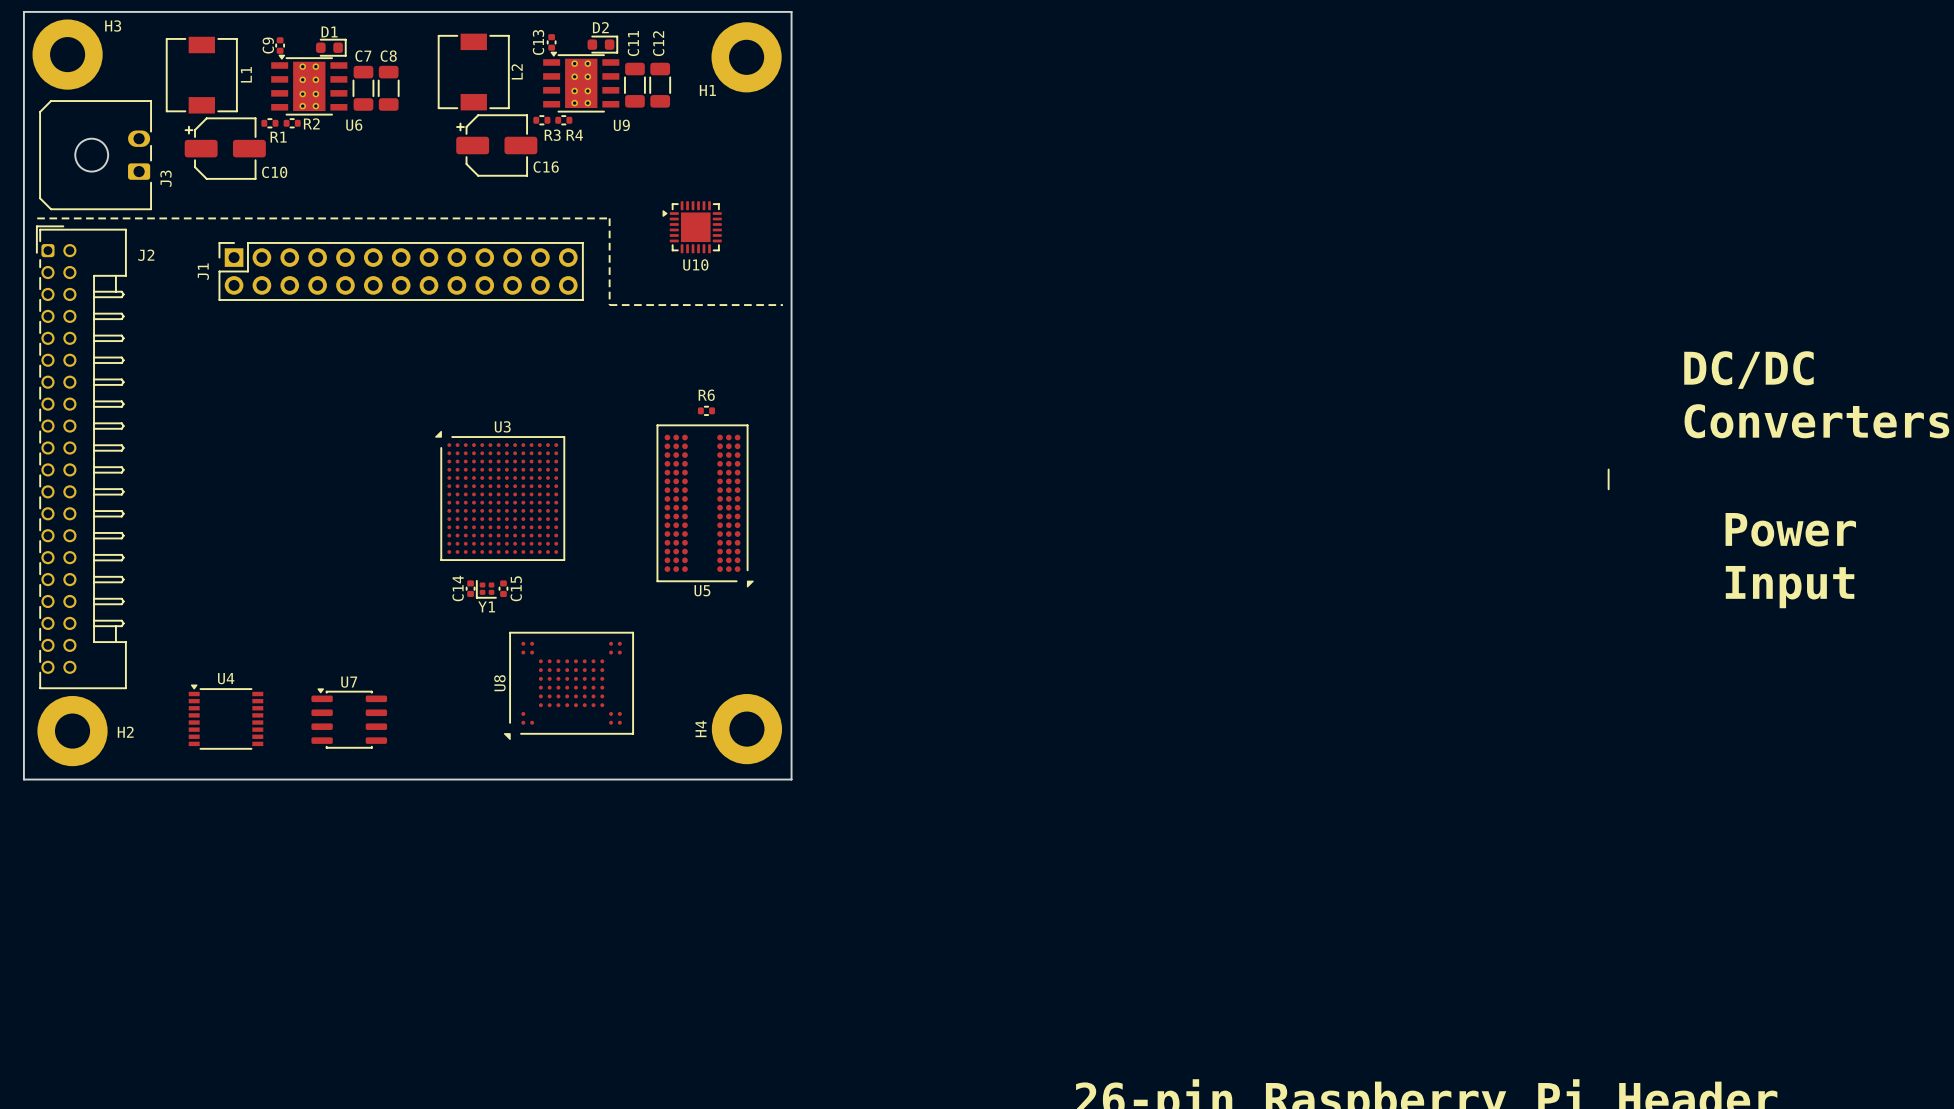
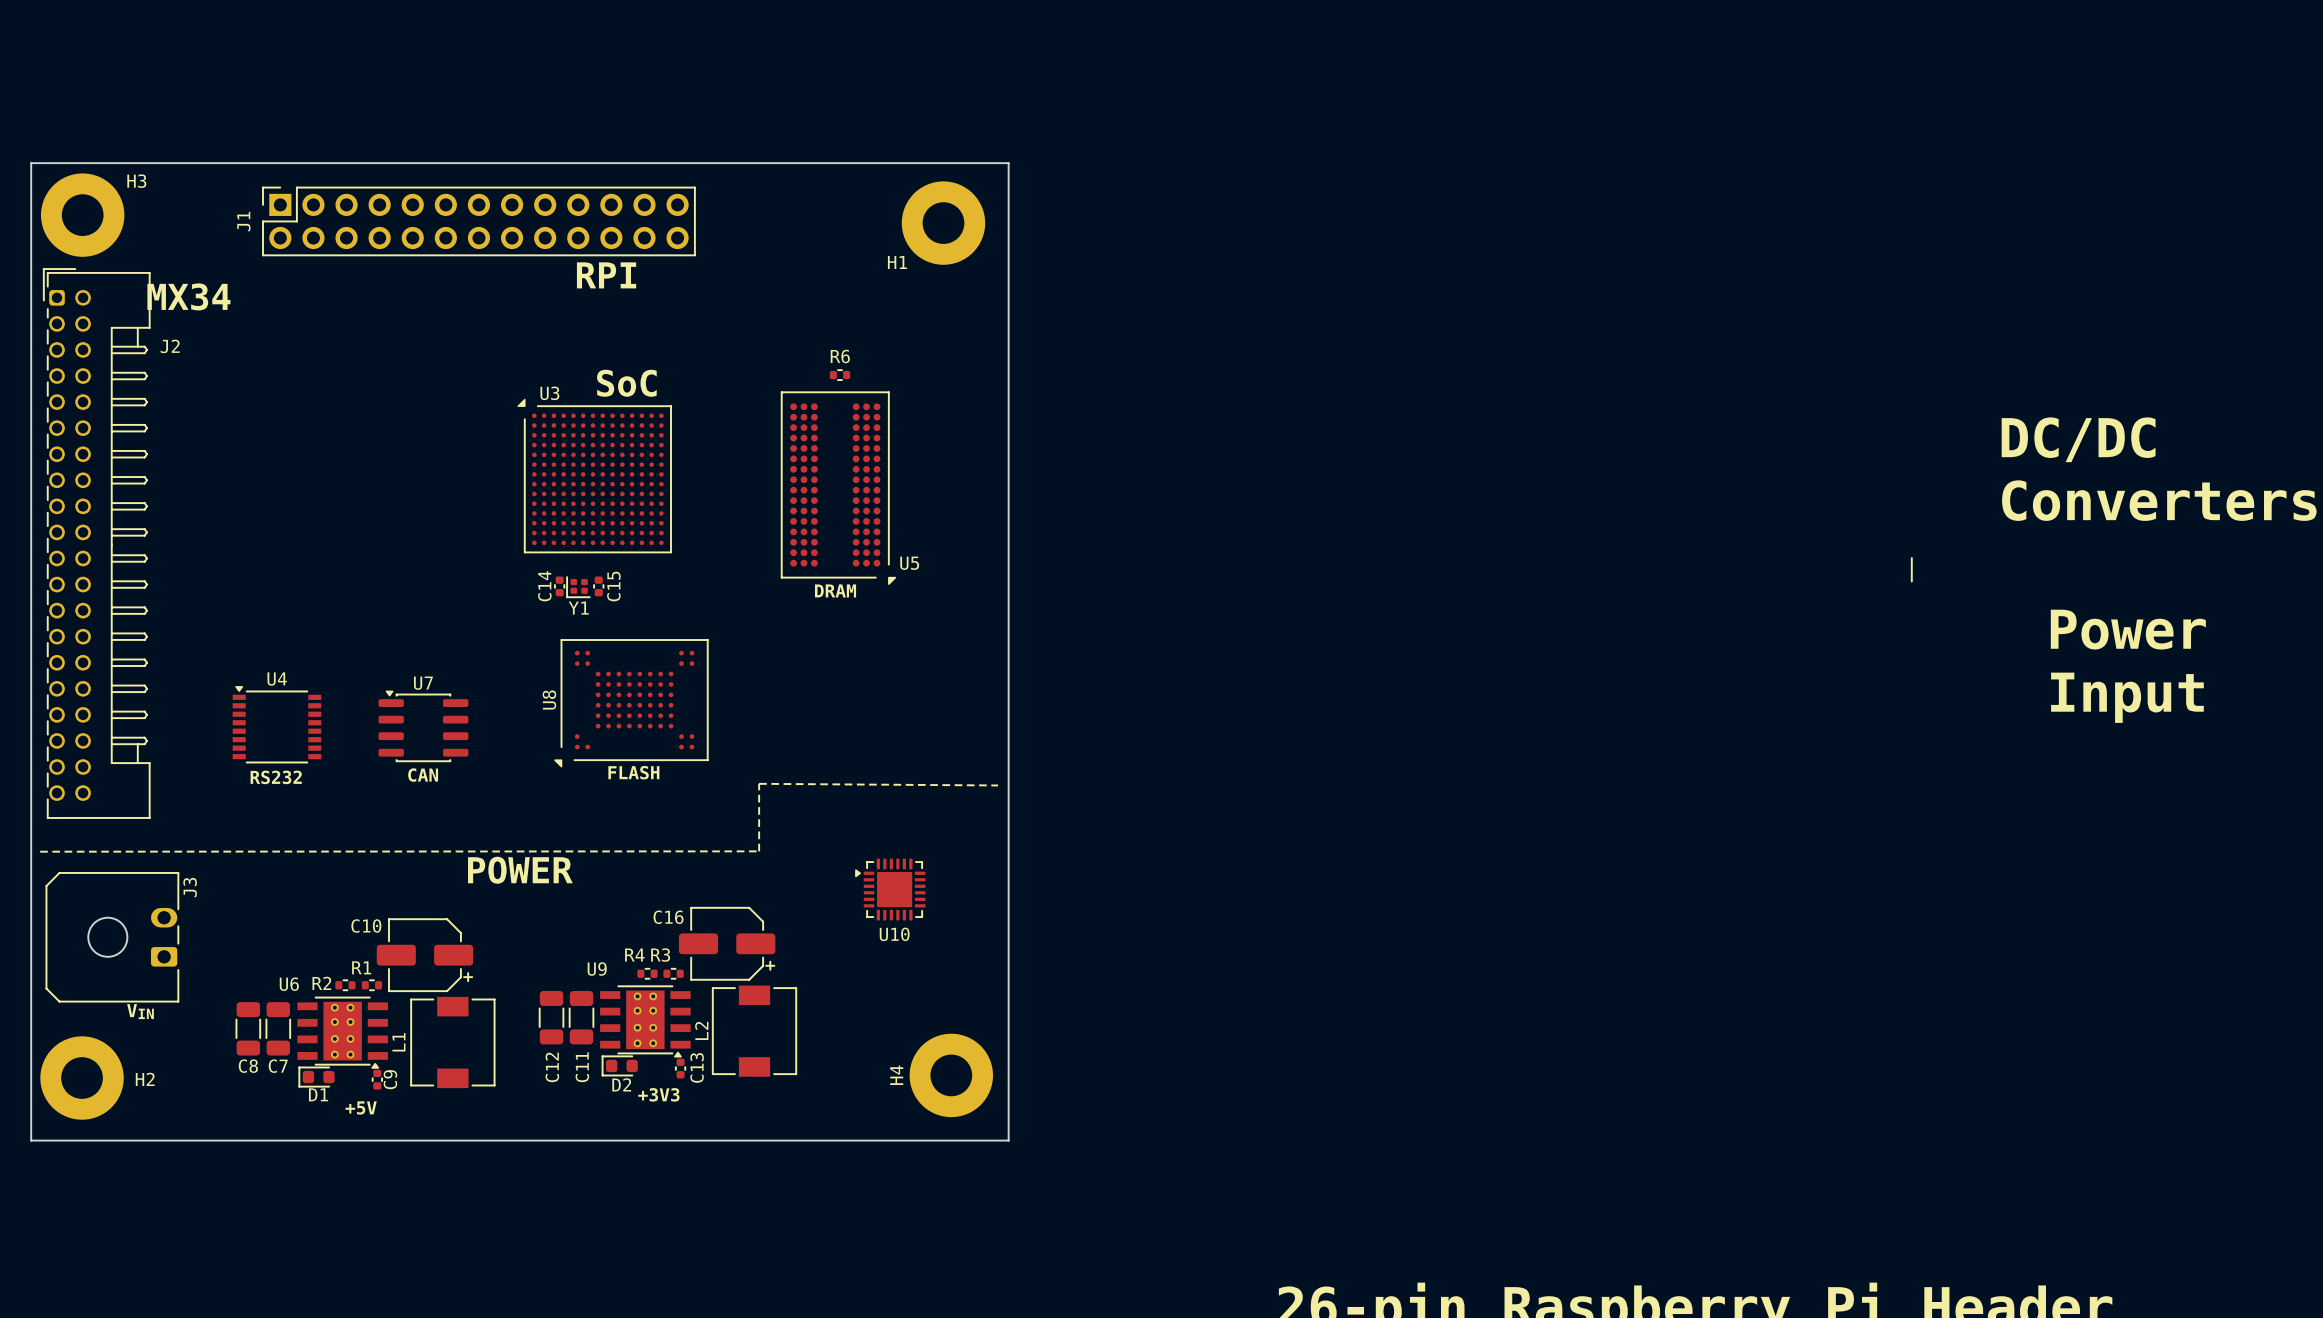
board edge: (23, 11) (791, 11) (791, 779) (23, 779) (23, 11) -> (31, 163) (31, 1140) (1008, 1140) (1008, 163) (31, 163)
C13 name position: C13 (538, 42) -> C13 (697, 1067)
C13 position: (551, 42) -> (680, 1068)
C11 name position: C11 (633, 43) -> C11 (582, 1067)
C12 name position: C12 (658, 43) -> C12 (552, 1067)
D2 rotation: 0° (602, 44) -> 180° (619, 1065)
D2 position: (602, 44) -> (619, 1065)
C9 name position: C9 (268, 45) -> C9 (390, 1079)
C9 position: (280, 45) -> (377, 1079)
D1 rotation: 0° (331, 47) -> 180° (316, 1077)
D1 position: (331, 47) -> (316, 1077)
H3 position: (67, 54) -> (82, 215)
C7 name position: C7 (363, 56) -> C7 (278, 1066)
C8 name position: C8 (388, 56) -> C8 (248, 1066)
H1 position: (746, 57) -> (943, 223)
L2 name position: L2 (517, 71) -> L2 (701, 1030)
L2 position: (473, 72) -> (754, 1031)
L1 name position: L1 (246, 74) -> L1 (398, 1042)
L1 position: (201, 75) -> (452, 1042)
U9 rotation: 0° (581, 82) -> 180° (645, 1021)
U9 position: (581, 82) -> (645, 1021)
U6 rotation: 0° (309, 85) -> 180° (342, 1032)
U6 position: (309, 85) -> (342, 1032)
C11 position: (634, 85) -> (581, 1017)
C12 position: (660, 85) -> (551, 1017)
C7 position: (363, 88) -> (278, 1028)
C8 position: (388, 88) -> (248, 1028)
R3 position: (541, 120) -> (673, 973)
R4 position: (563, 120) -> (647, 973)
R1 position: (269, 123) -> (371, 985)
R2 position: (292, 123) -> (345, 985)
R2 name position: R2 (311, 123) -> R2 (321, 983)
R3 name position: R3 (552, 135) -> R3 (660, 955)
R4 name position: R4 (574, 135) -> R4 (634, 955)
R1 name position: R1 (278, 137) -> R1 (361, 967)
C16 rotation: 0° (496, 145) -> 180° (727, 943)
C16 position: (496, 145) -> (727, 943)
C10 rotation: 0° (225, 148) -> 180° (424, 955)
C10 position: (225, 148) -> (424, 955)
J3 position: (95, 155) -> (112, 937)
J3 name position: J3 (165, 178) -> J3 (190, 887)
line: (37, 218) (609, 218) (609, 305) (782, 305) -> none
U10 position: (692, 227) -> (890, 889)
text: none -> RPI (606, 275)
text: none -> MX34 (188, 296)
J2 name position: J2 (146, 255) -> J2 (170, 346)
J1 position: (401, 271) -> (478, 221)
text: none -> SoC (626, 383)
R6 position: (706, 410) -> (839, 375)
U3 name position: U3 (502, 426) -> U3 (549, 393)
U3 position: (500, 495) -> (594, 476)
text: none -> DRAM (835, 590)
U5 position: (705, 506) -> (838, 488)
C14 position: (470, 588) -> (559, 586)
C15 position: (503, 588) -> (598, 586)
Y1 position: (486, 589) -> (578, 587)
U5 name position: U5 (702, 590) -> U5 (909, 563)
text: none -> FLASH (633, 772)
text: none -> CAN (423, 775)
text: none -> RS232 (276, 777)
line: none -> (998, 785) (759, 783) (759, 851) (40, 851)
U8 position: (568, 686) -> (631, 703)
U4 position: (225, 717) -> (276, 724)
U7 position: (349, 718) -> (423, 726)
H4 position: (746, 729) -> (951, 1075)
H2 position: (72, 731) -> (82, 1078)
text: none -> POWER (520, 870)
text: none -> VIN (140, 1011)
text: none -> +3V3 (658, 1094)
text: none -> +5V (361, 1107)

